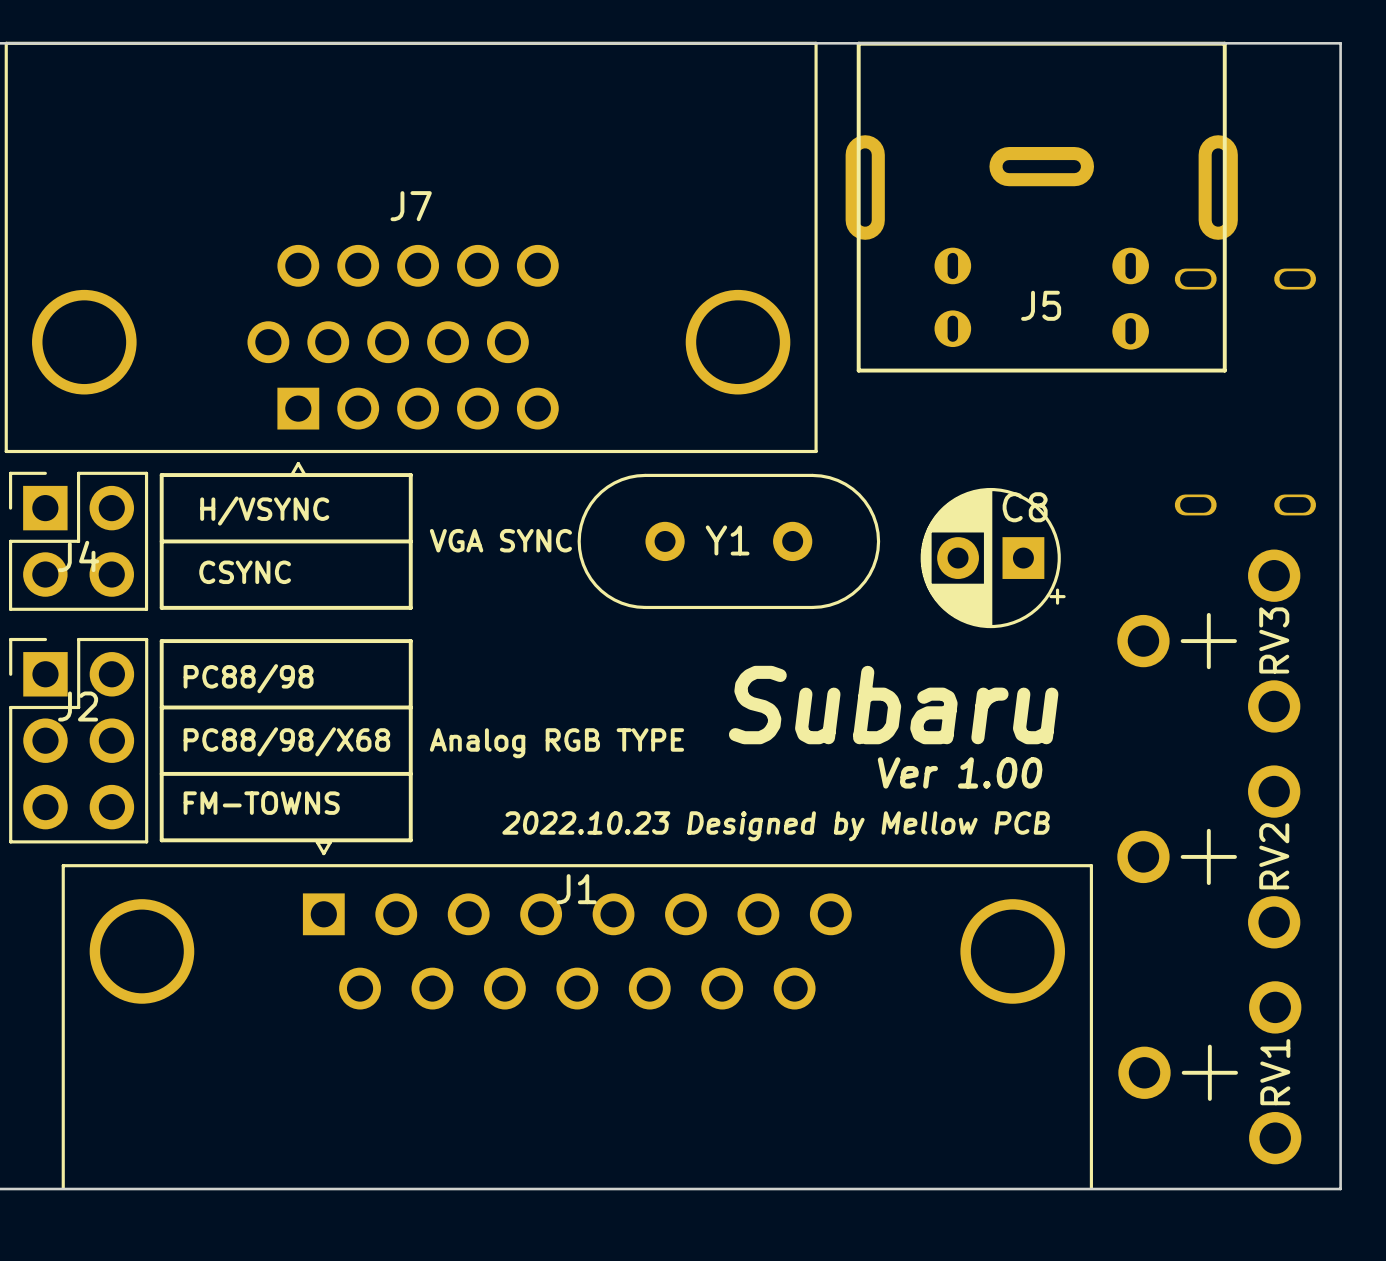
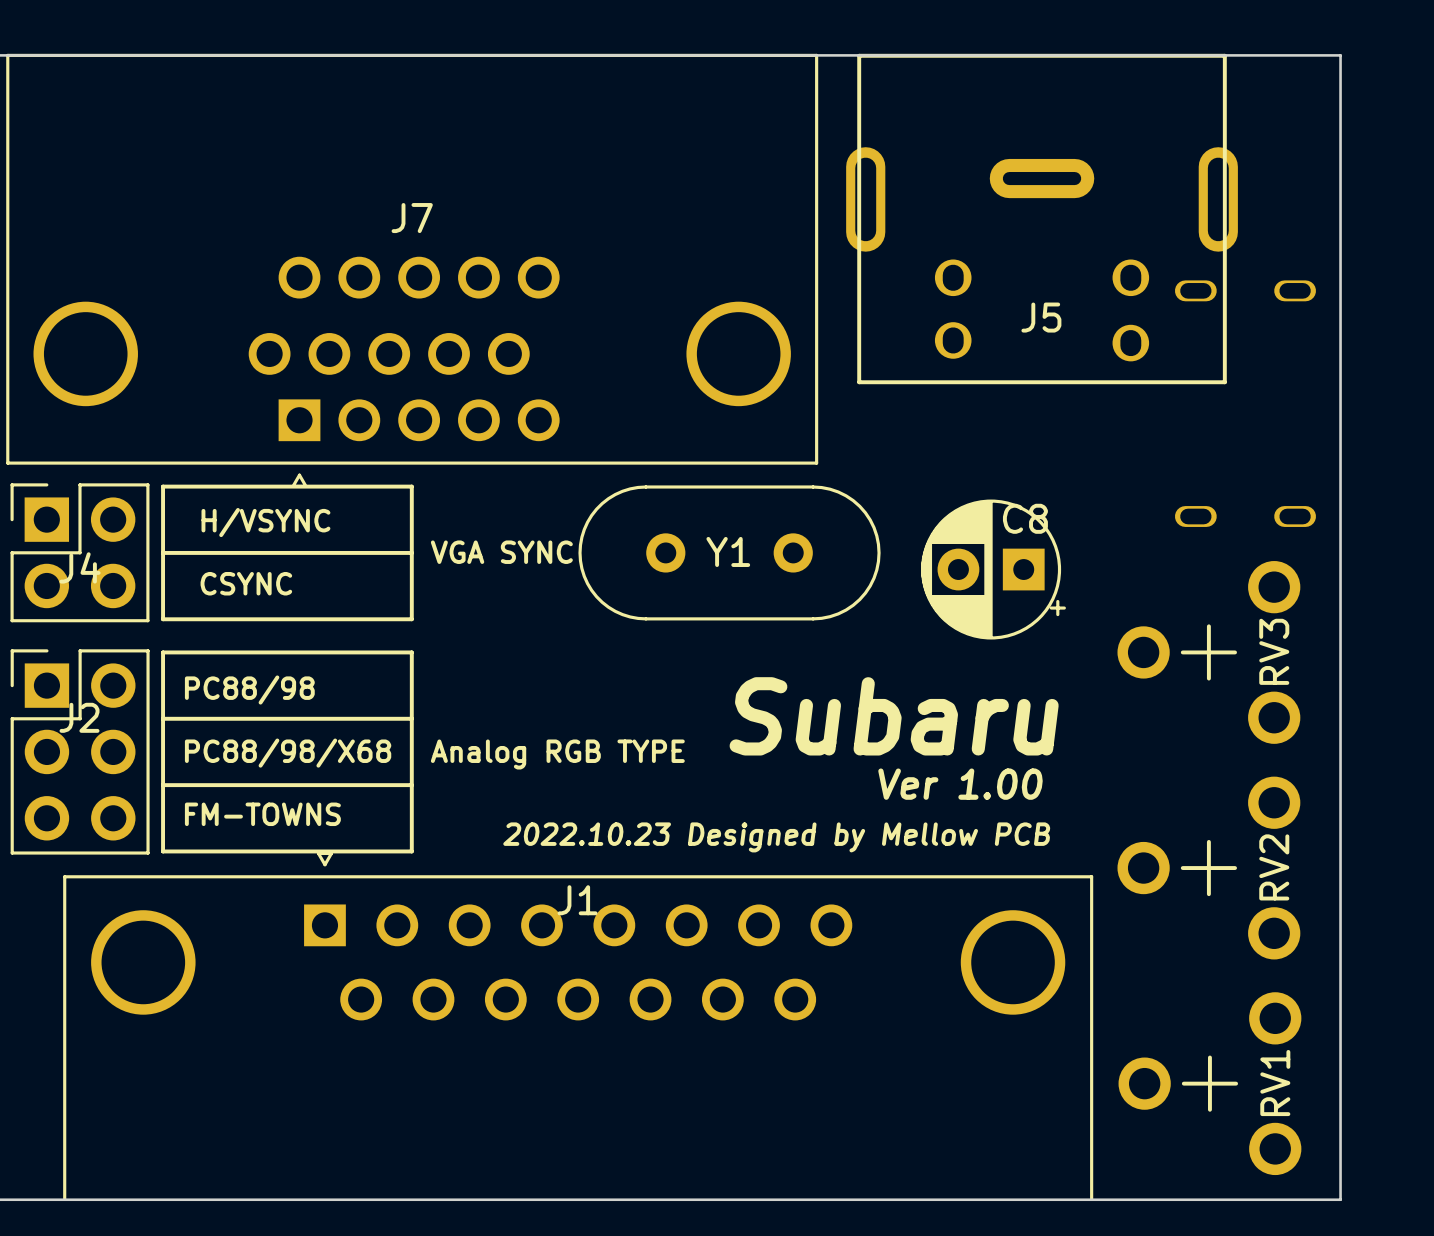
J5 footprint: [845, 41, 1238, 373] -> [846, 53, 1238, 385]

